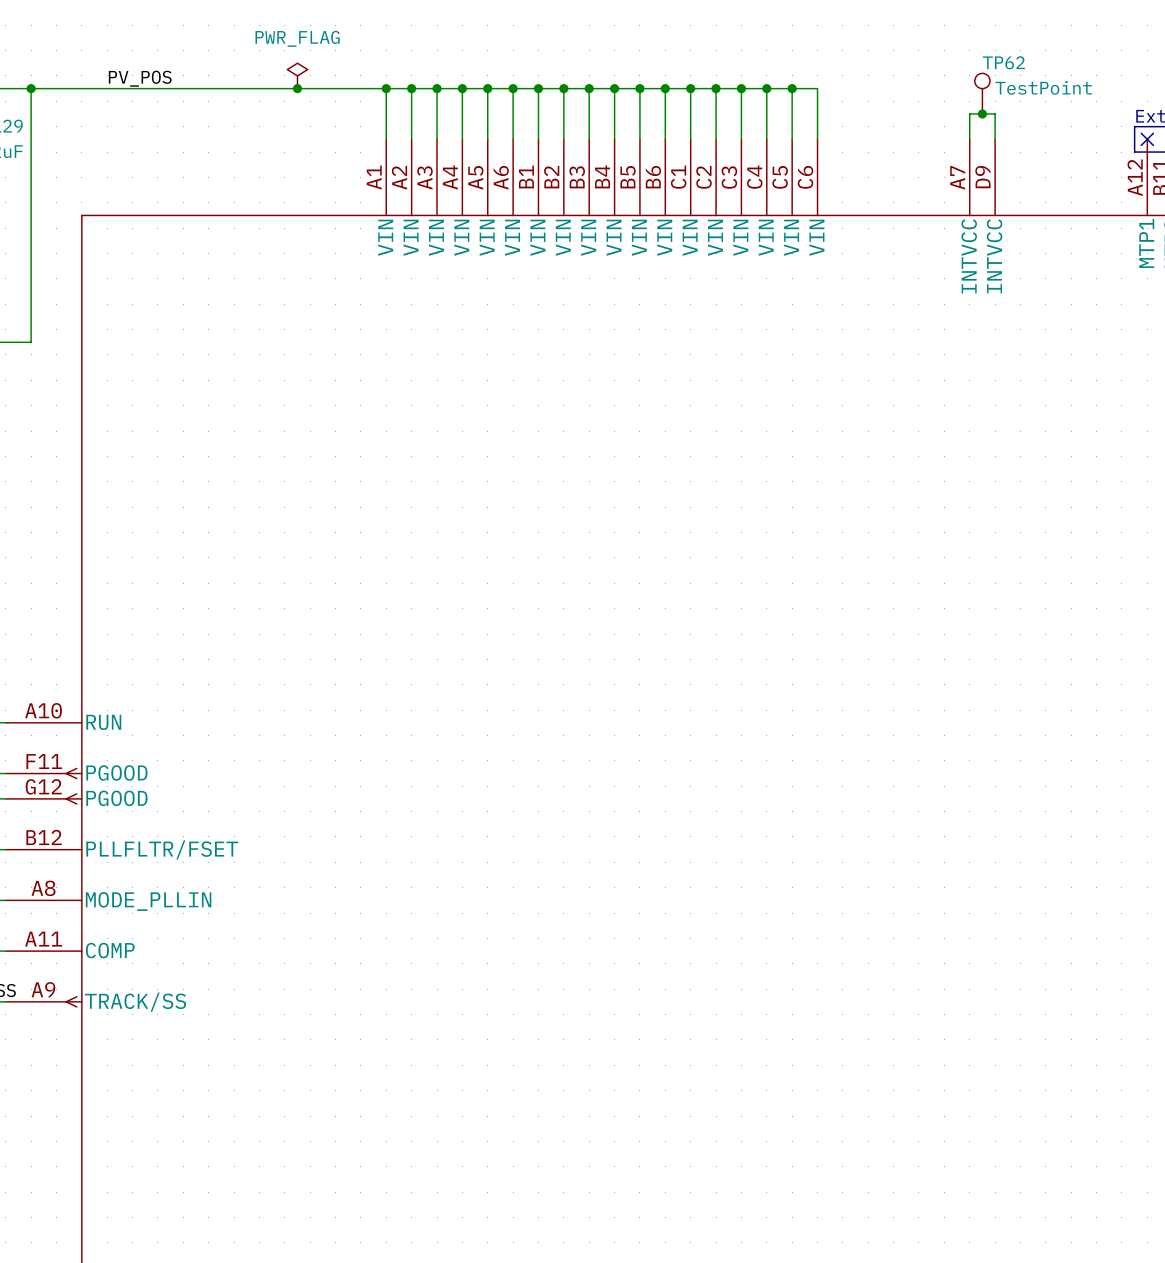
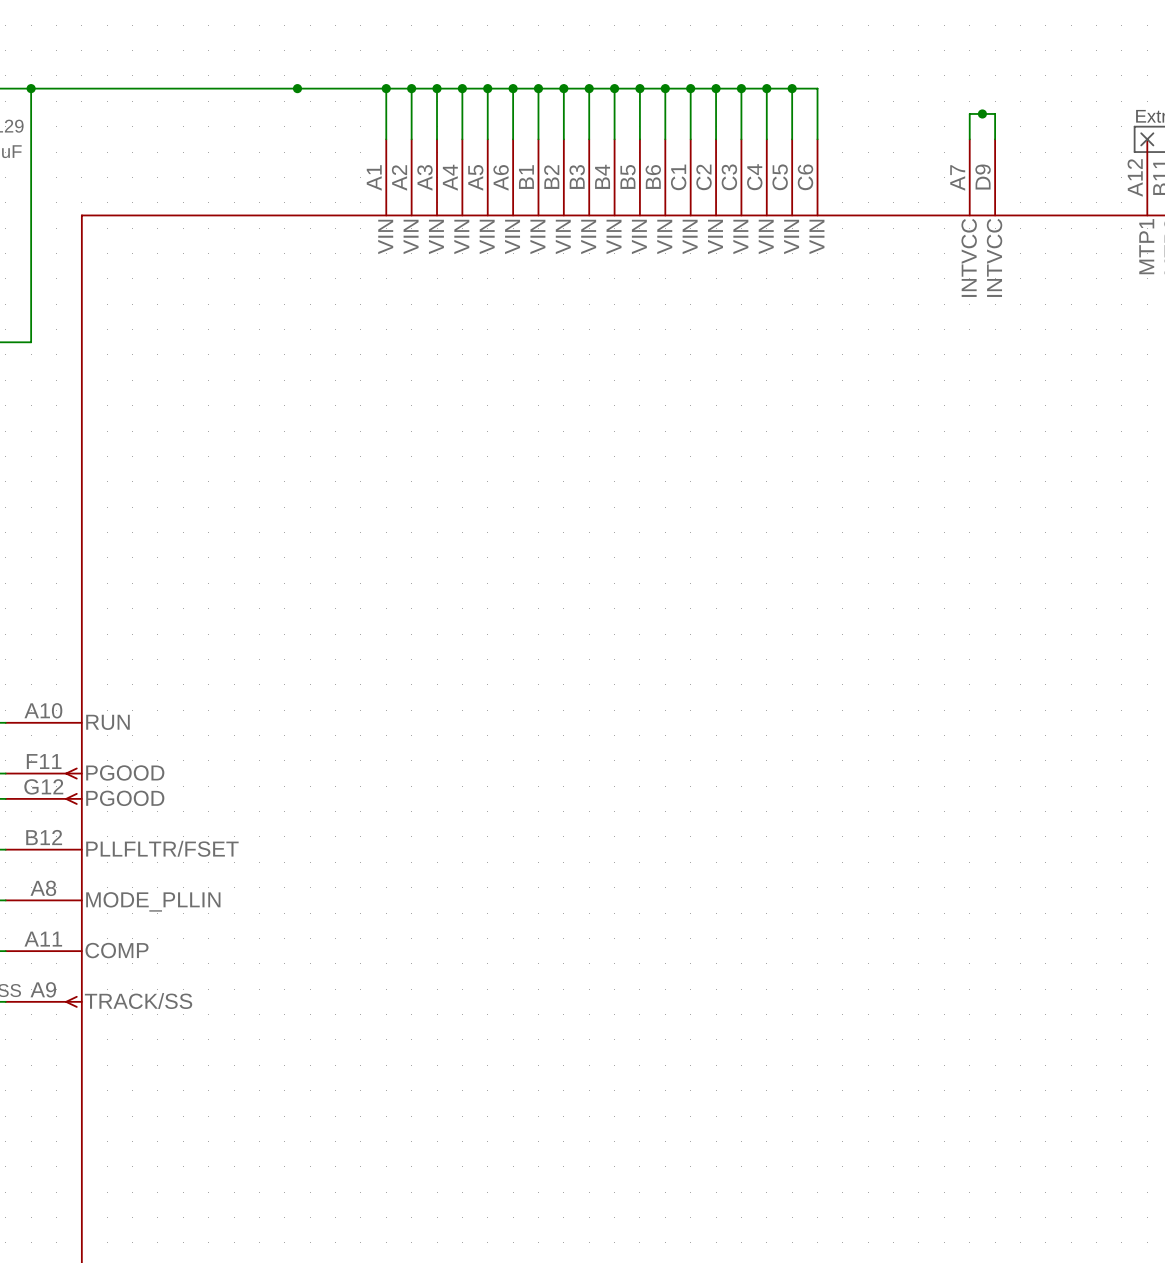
power symbol: PWR_FLAG (297, 75) -> none
label: PV_POS (140, 78) -> none
TP62: TestPoint (982, 93) -> none

